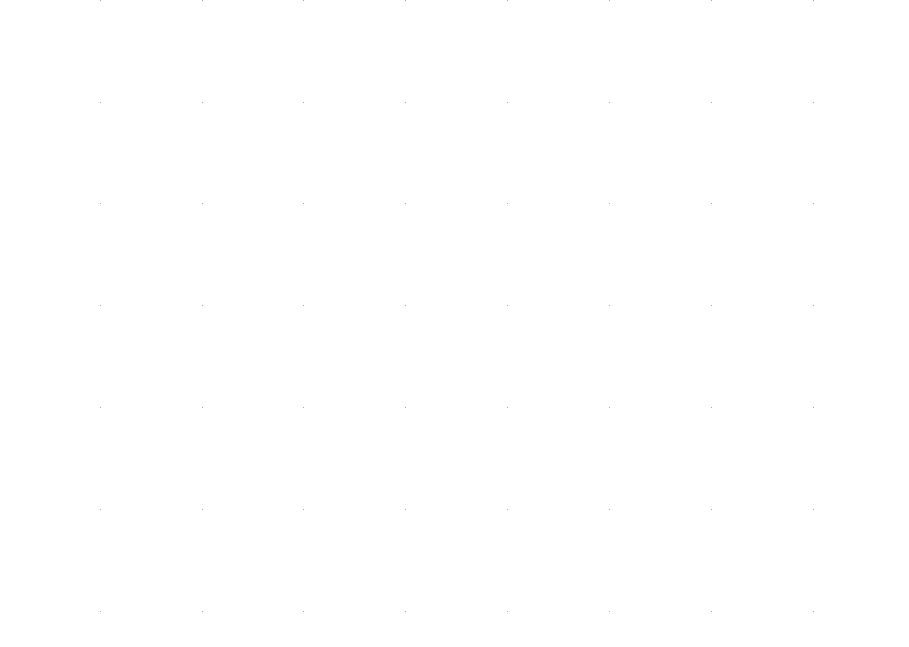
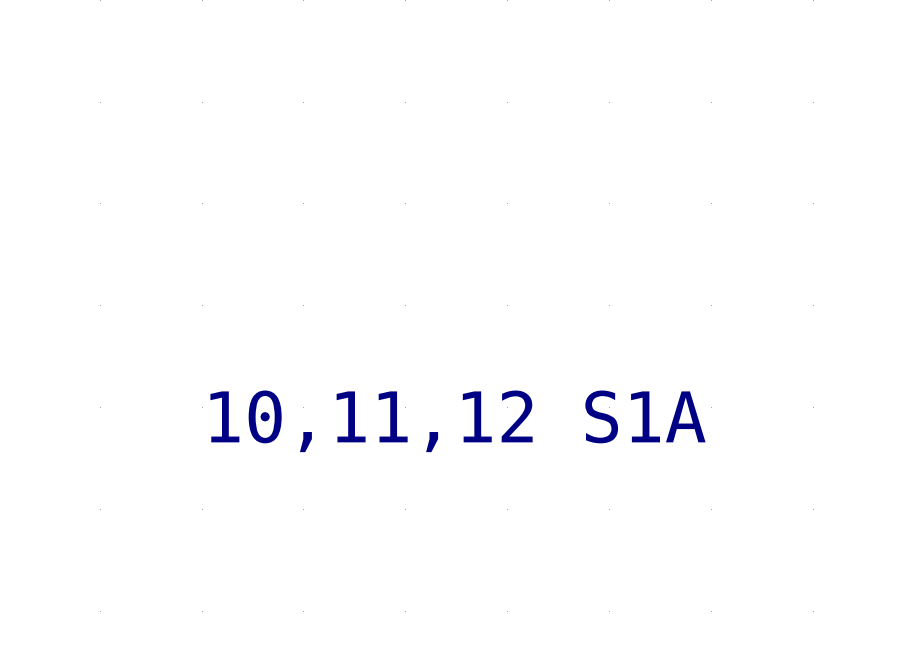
text: none -> 10,11,12 S1A (457, 421)

